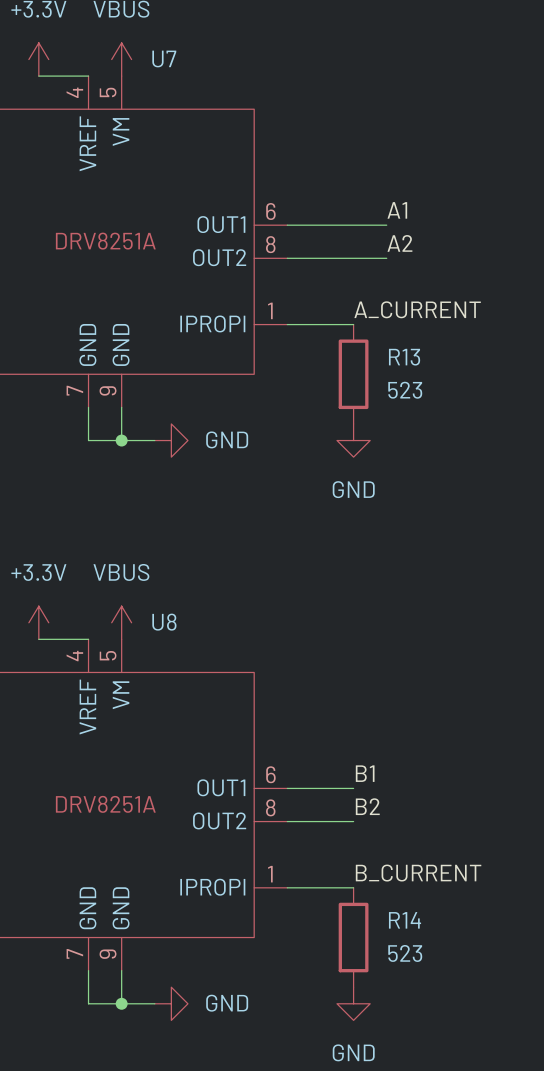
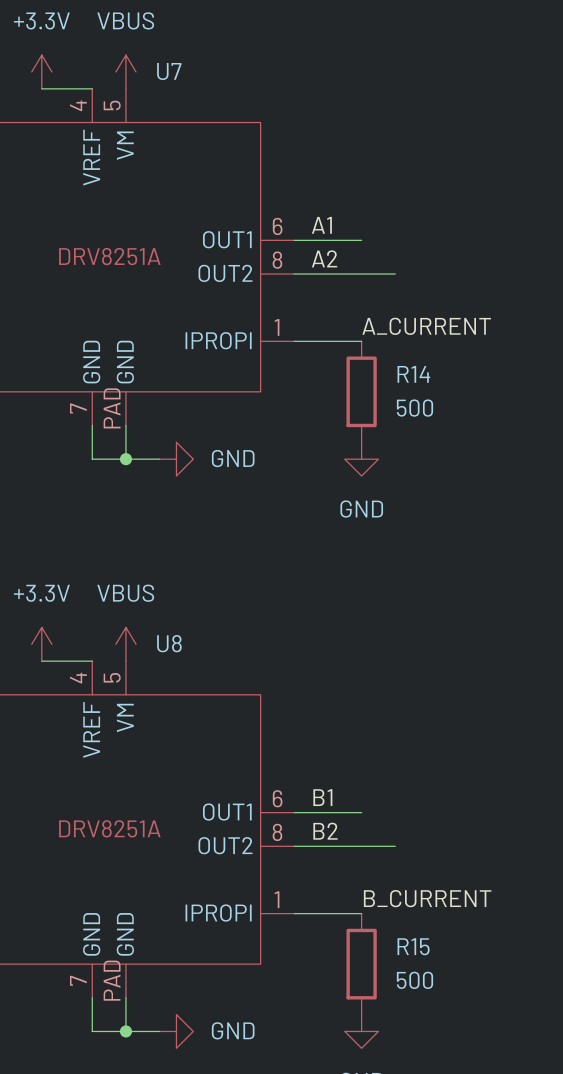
label position: A1 (397, 210) -> A1 (321, 225)
wire: (353, 225) (386, 225) -> none
label position: A2 (399, 243) -> A2 (324, 258)
R13 name: R13 (404, 357) -> R14 (413, 374)
U7 pin number: 9 (108, 390) -> PAD (112, 408)
R13 value: 523 (405, 390) -> 500 (414, 408)
label position: B1 (365, 773) -> B1 (322, 797)
label position: B2 (367, 806) -> B2 (325, 831)
wire: none -> (361, 846) (395, 846)
R14 name: R14 (405, 920) -> R15 (413, 946)
R14 value: 523 (405, 953) -> 500 (414, 980)
U8 pin number: 9 (108, 954) -> PAD (112, 980)

